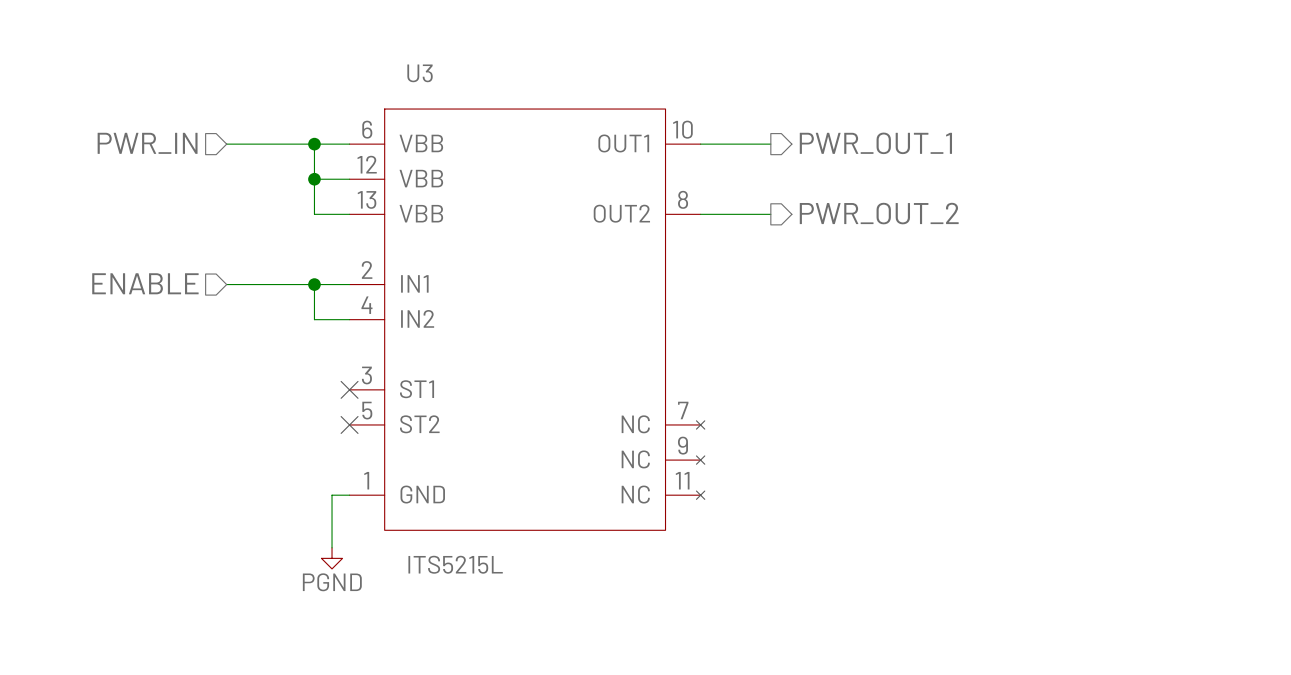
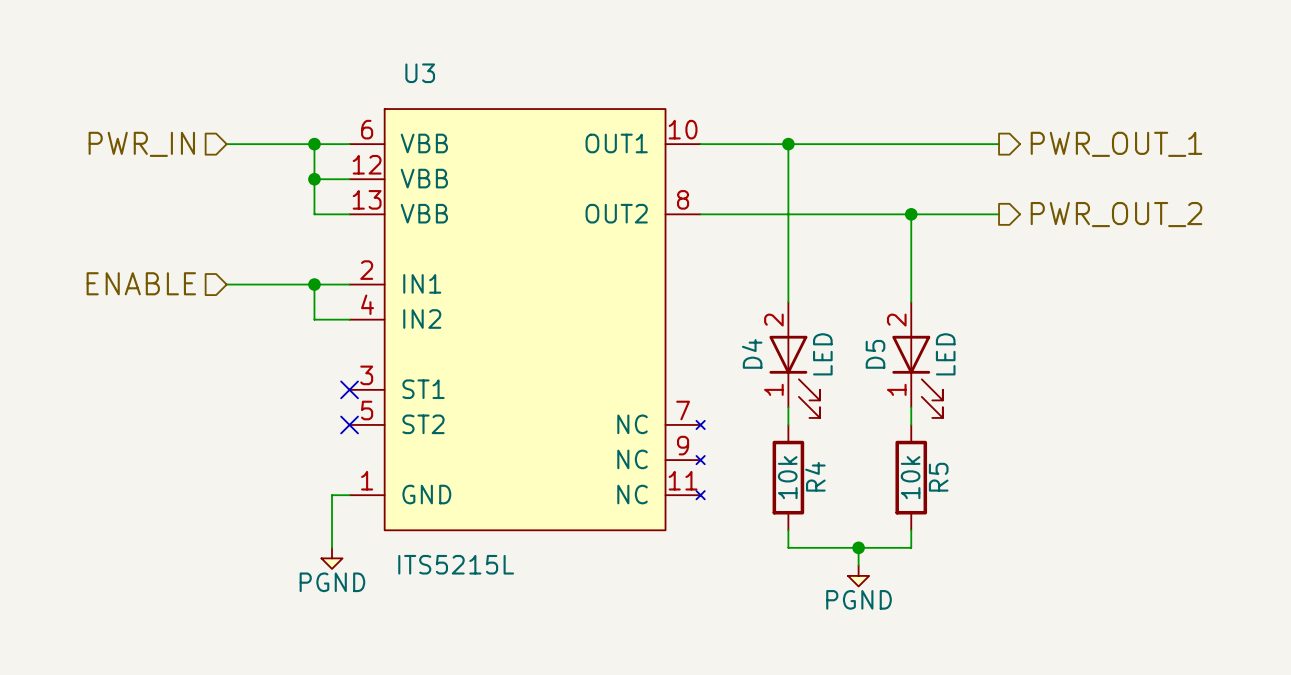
hierarchical label position: PWR_OUT_1 (875, 143) -> PWR_OUT_1 (1116, 144)
wire: none -> (770, 144) (999, 144)
wire: none -> (788, 144) (788, 302)
junction: none -> (788, 144)
hierarchical label position: PWR_OUT_2 (879, 213) -> PWR_OUT_2 (1116, 214)
wire: none -> (770, 214) (999, 214)
wire: none -> (911, 214) (911, 302)
junction: none -> (911, 214)
D4: none -> LED (794, 360)
D5: none -> LED (917, 360)
wire: none -> (788, 407) (788, 424)
wire: none -> (911, 407) (911, 424)
R4: none -> 10k (788, 477)
R5: none -> 10k (911, 477)
wire: none -> (788, 530) (788, 547) (911, 547) (911, 530)
wire: none -> (858, 547) (858, 565)
junction: none -> (858, 547)
power symbol: none -> PGND (858, 575)

